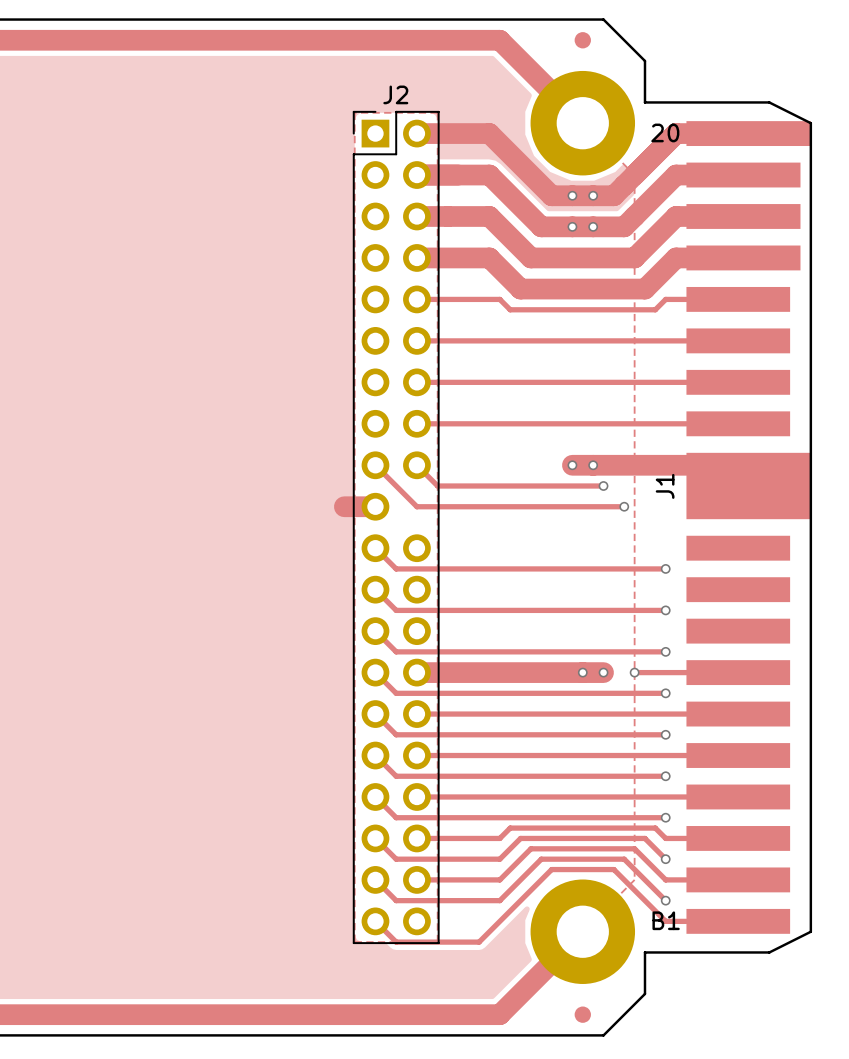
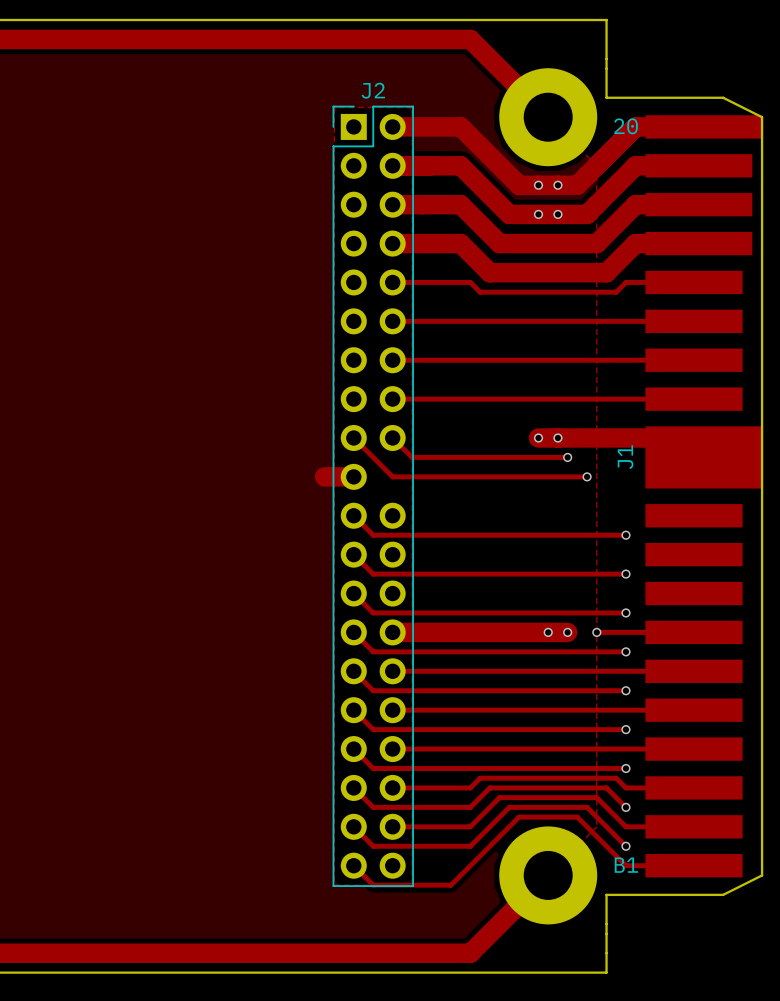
board edge: (603, 19) (644, 61) -> (567, 20) (606, 20) (606, 58)
part: (582, 40) -> none
board edge: (644, 993) (603, 1035) -> (606, 933) (606, 972) (567, 972)
part: (582, 1014) -> none

